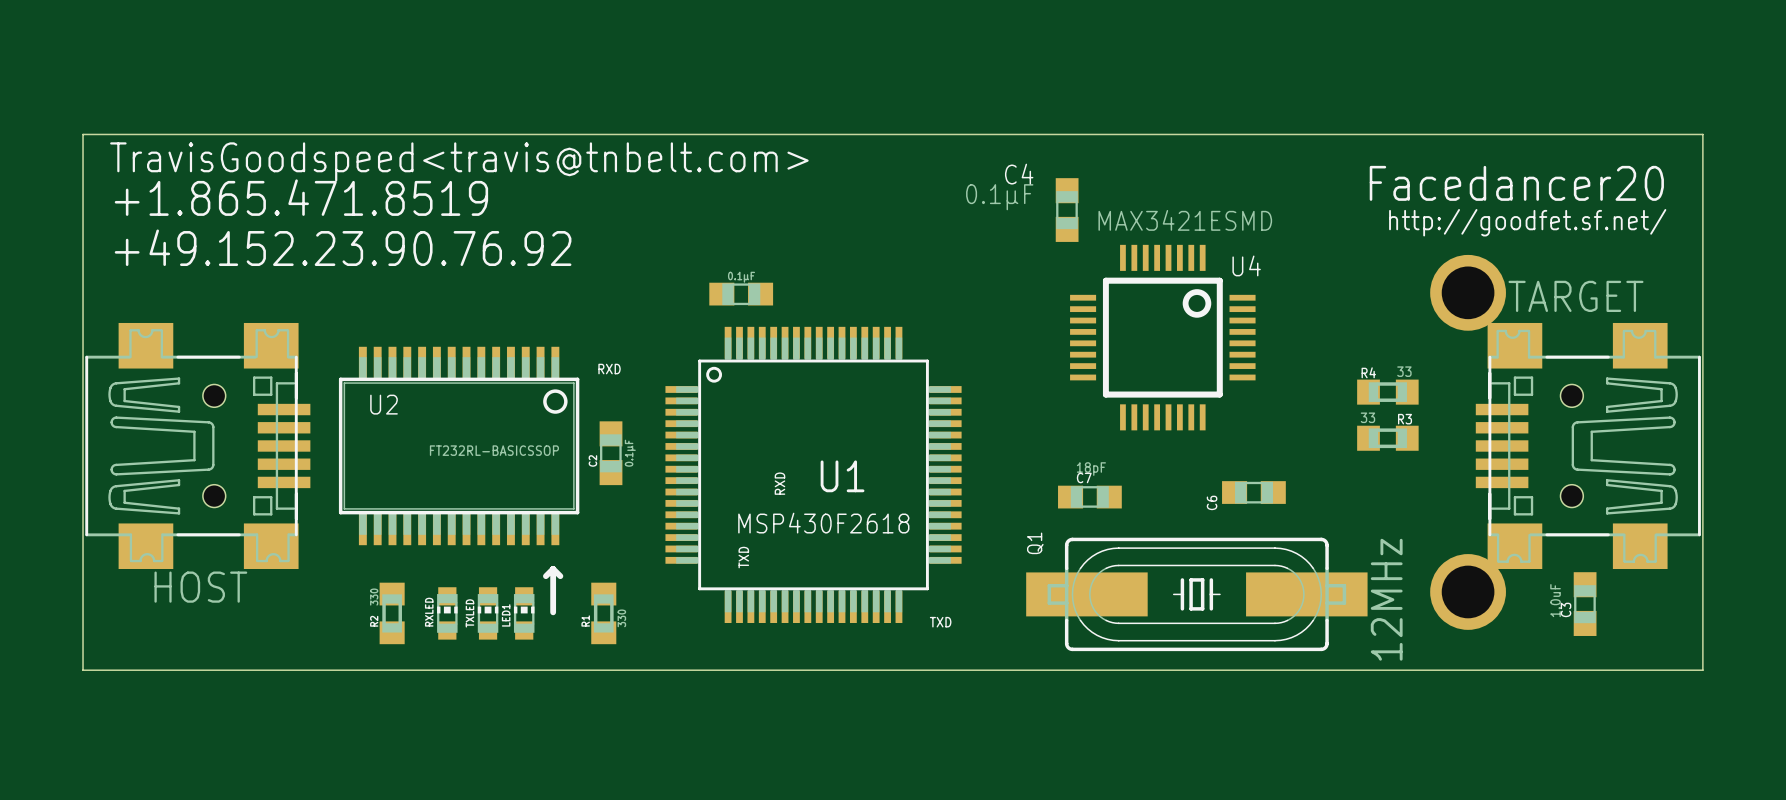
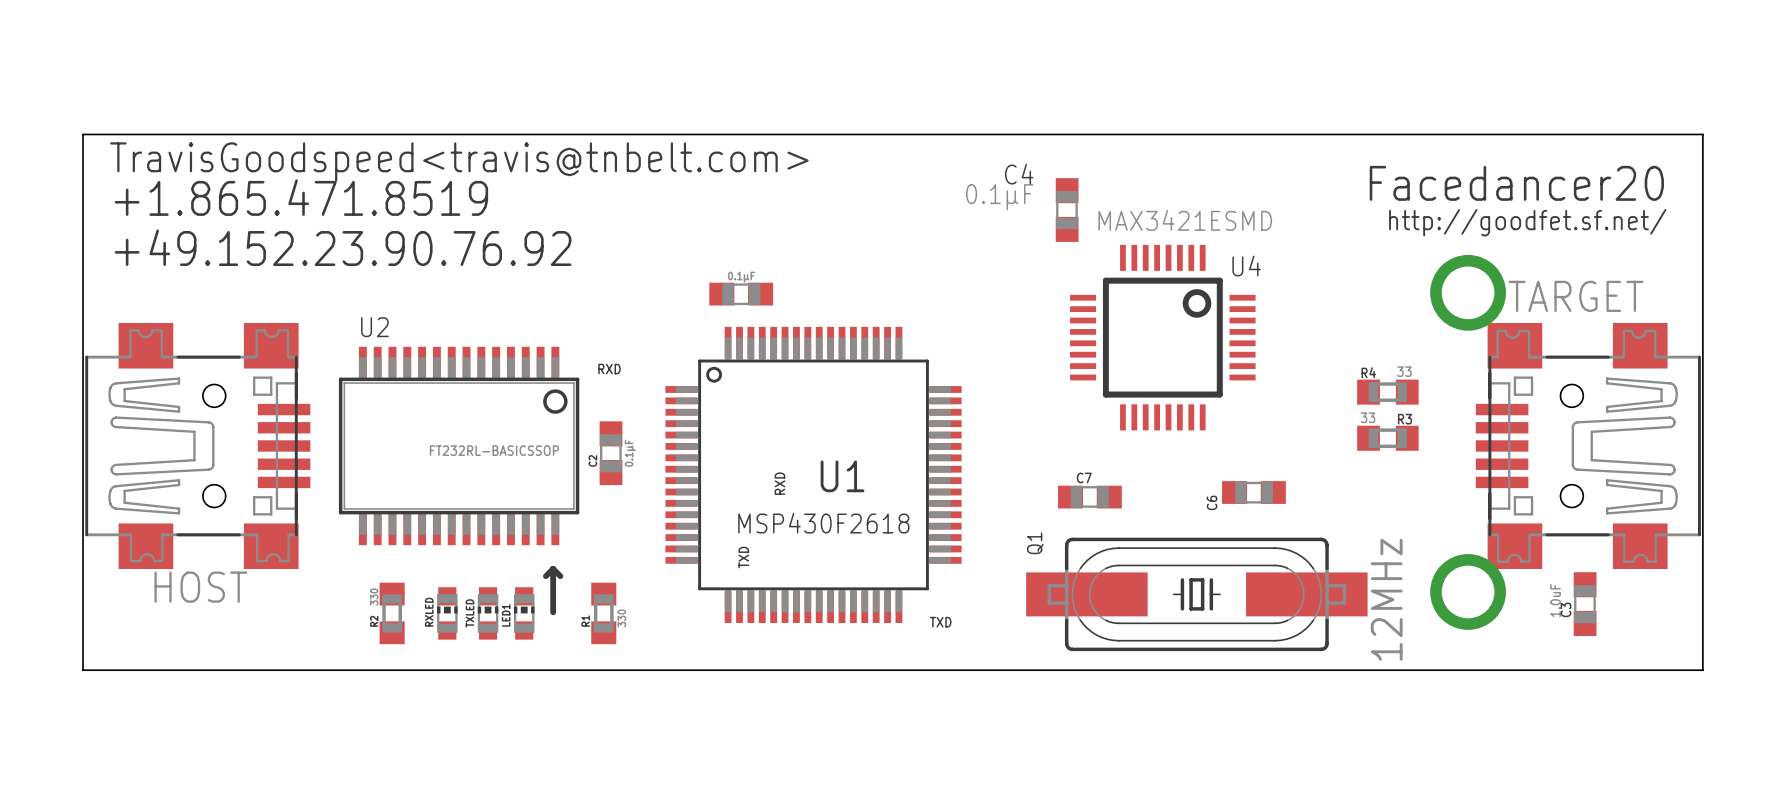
U2 name position: U2 (384, 404) -> U2 (374, 327)
C7 value: 18pF (1091, 469) -> none

